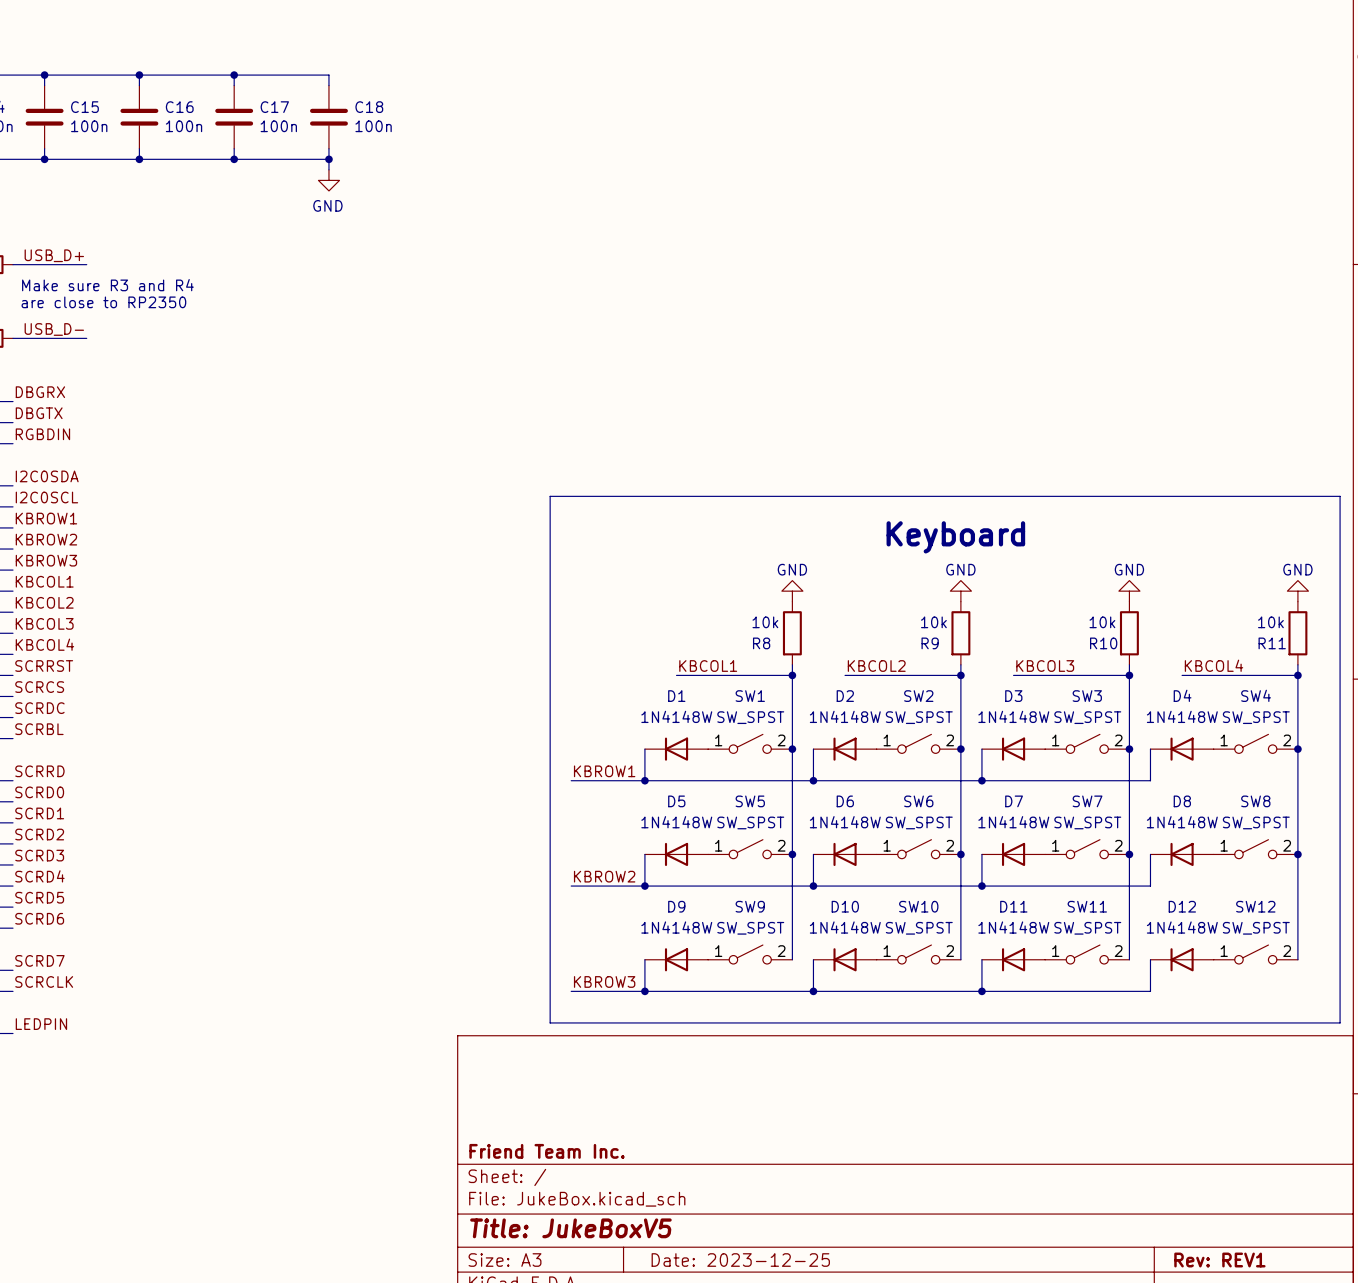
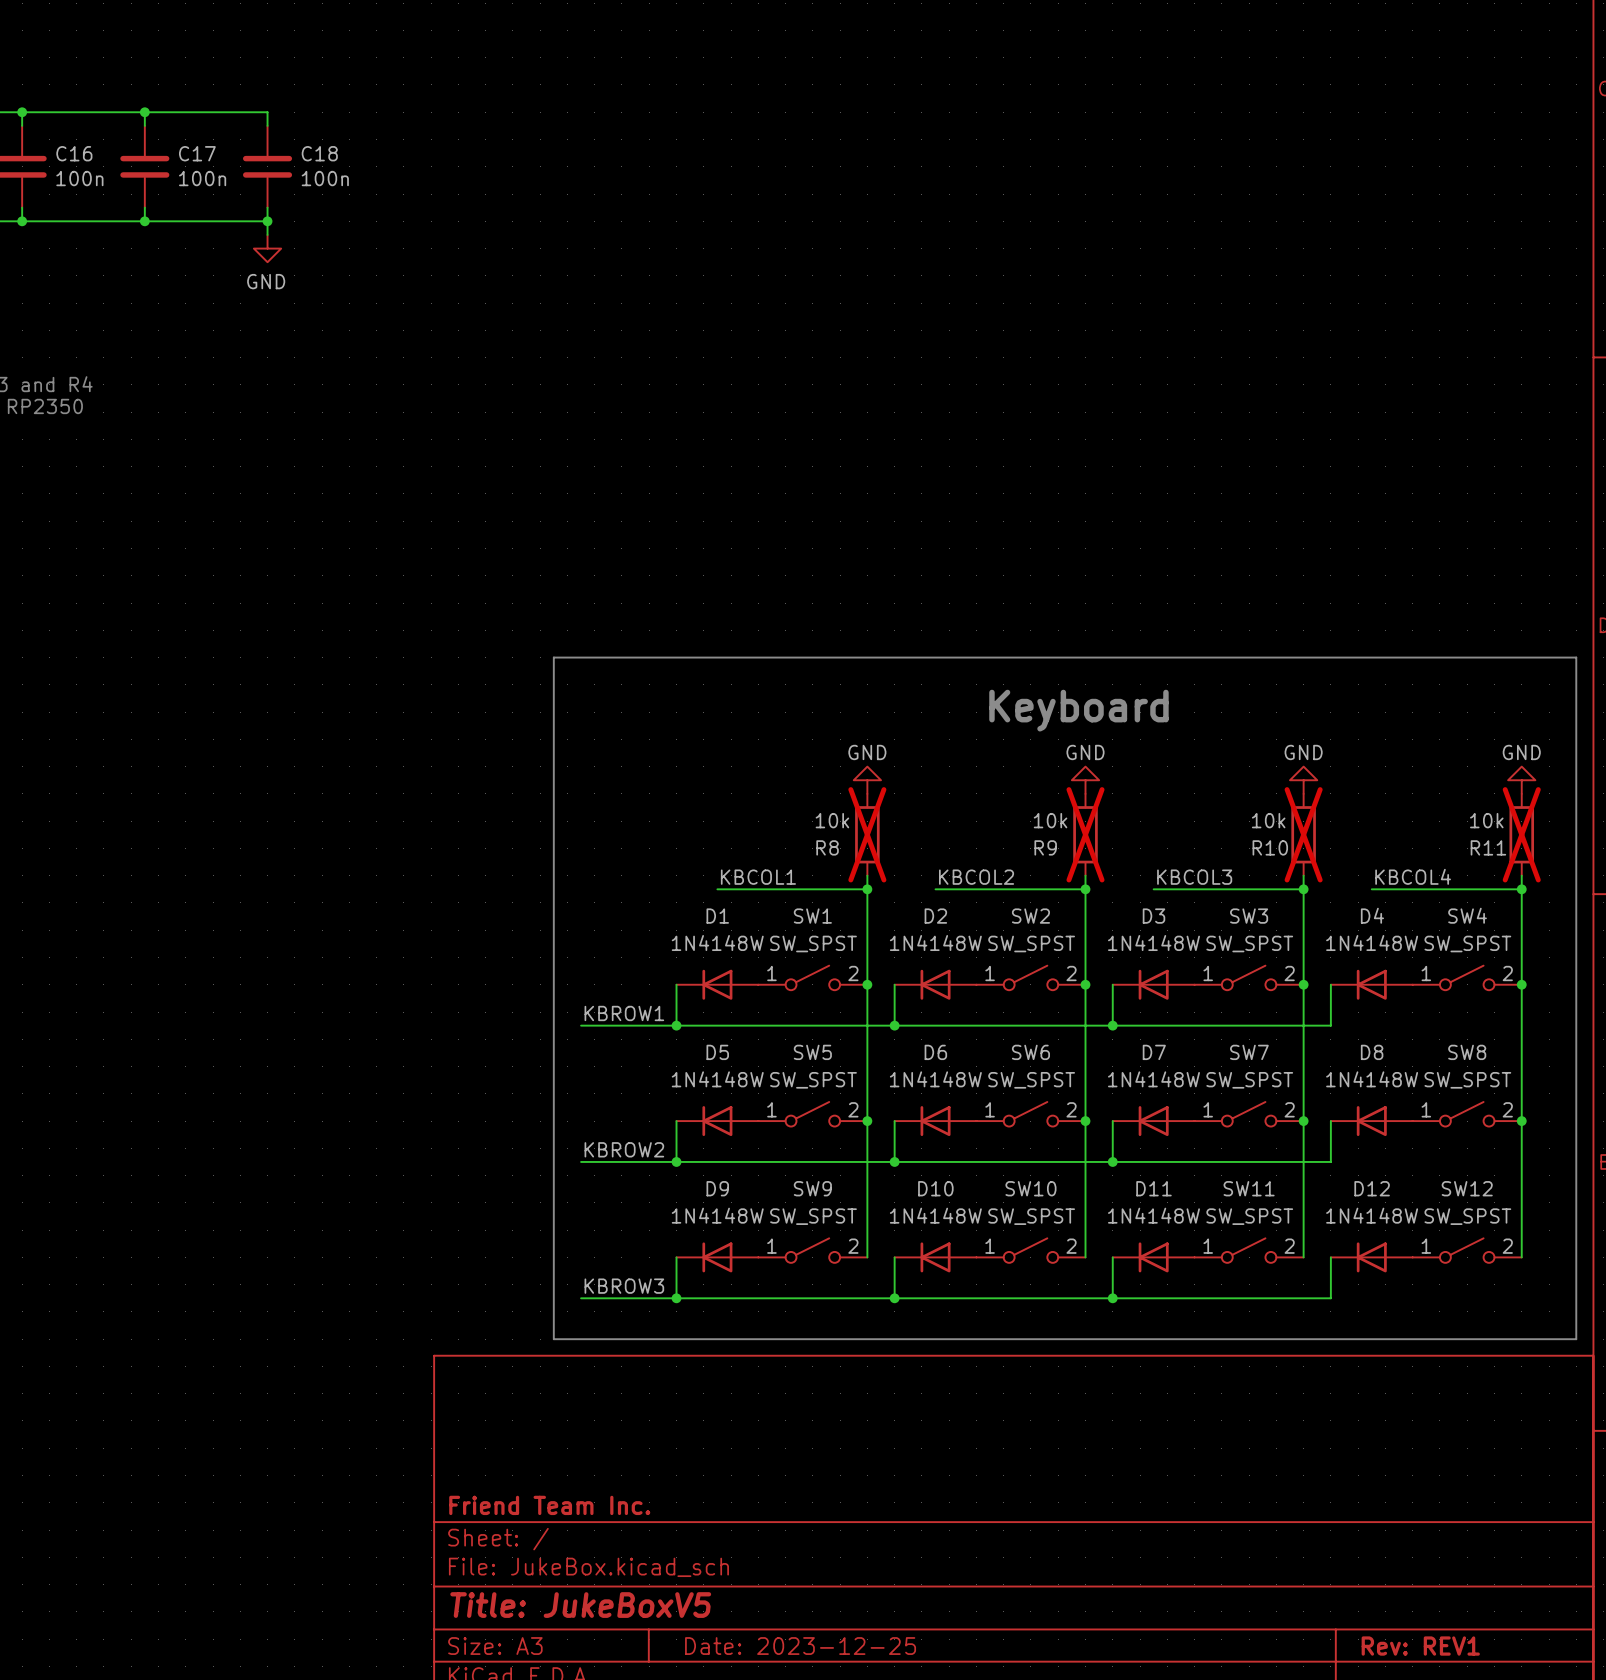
R8 do-not-place cross: none -> (867, 834)
R9 do-not-place cross: none -> (1085, 834)
R10 do-not-place cross: none -> (1303, 834)
R11 do-not-place cross: none -> (1521, 834)

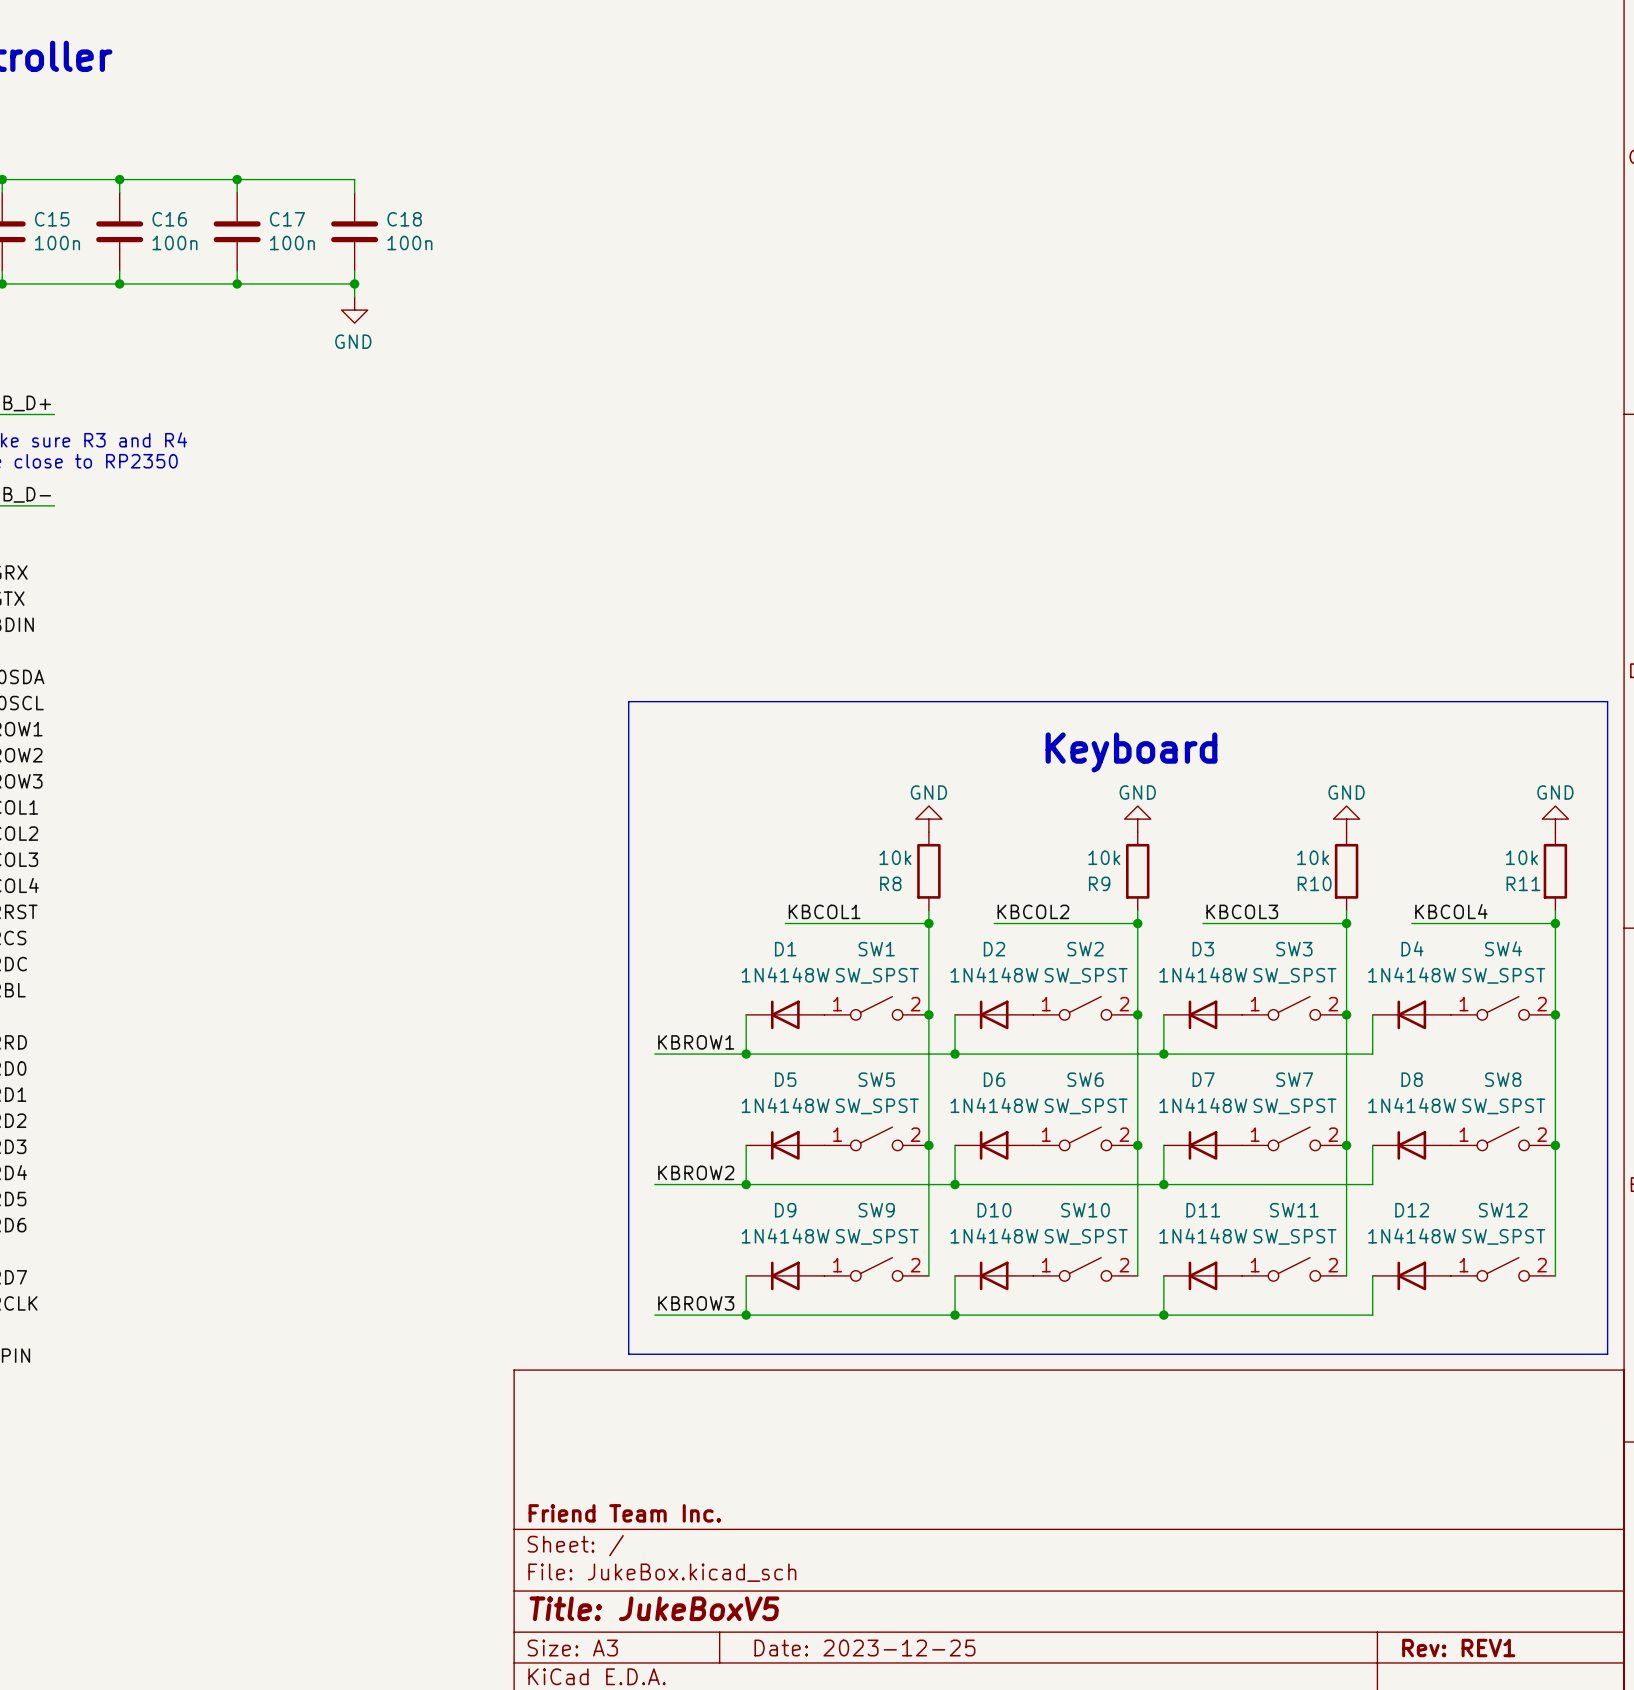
R8 do-not-place cross: (867, 834) -> none
R9 do-not-place cross: (1085, 834) -> none
R10 do-not-place cross: (1303, 834) -> none
R11 do-not-place cross: (1521, 834) -> none

